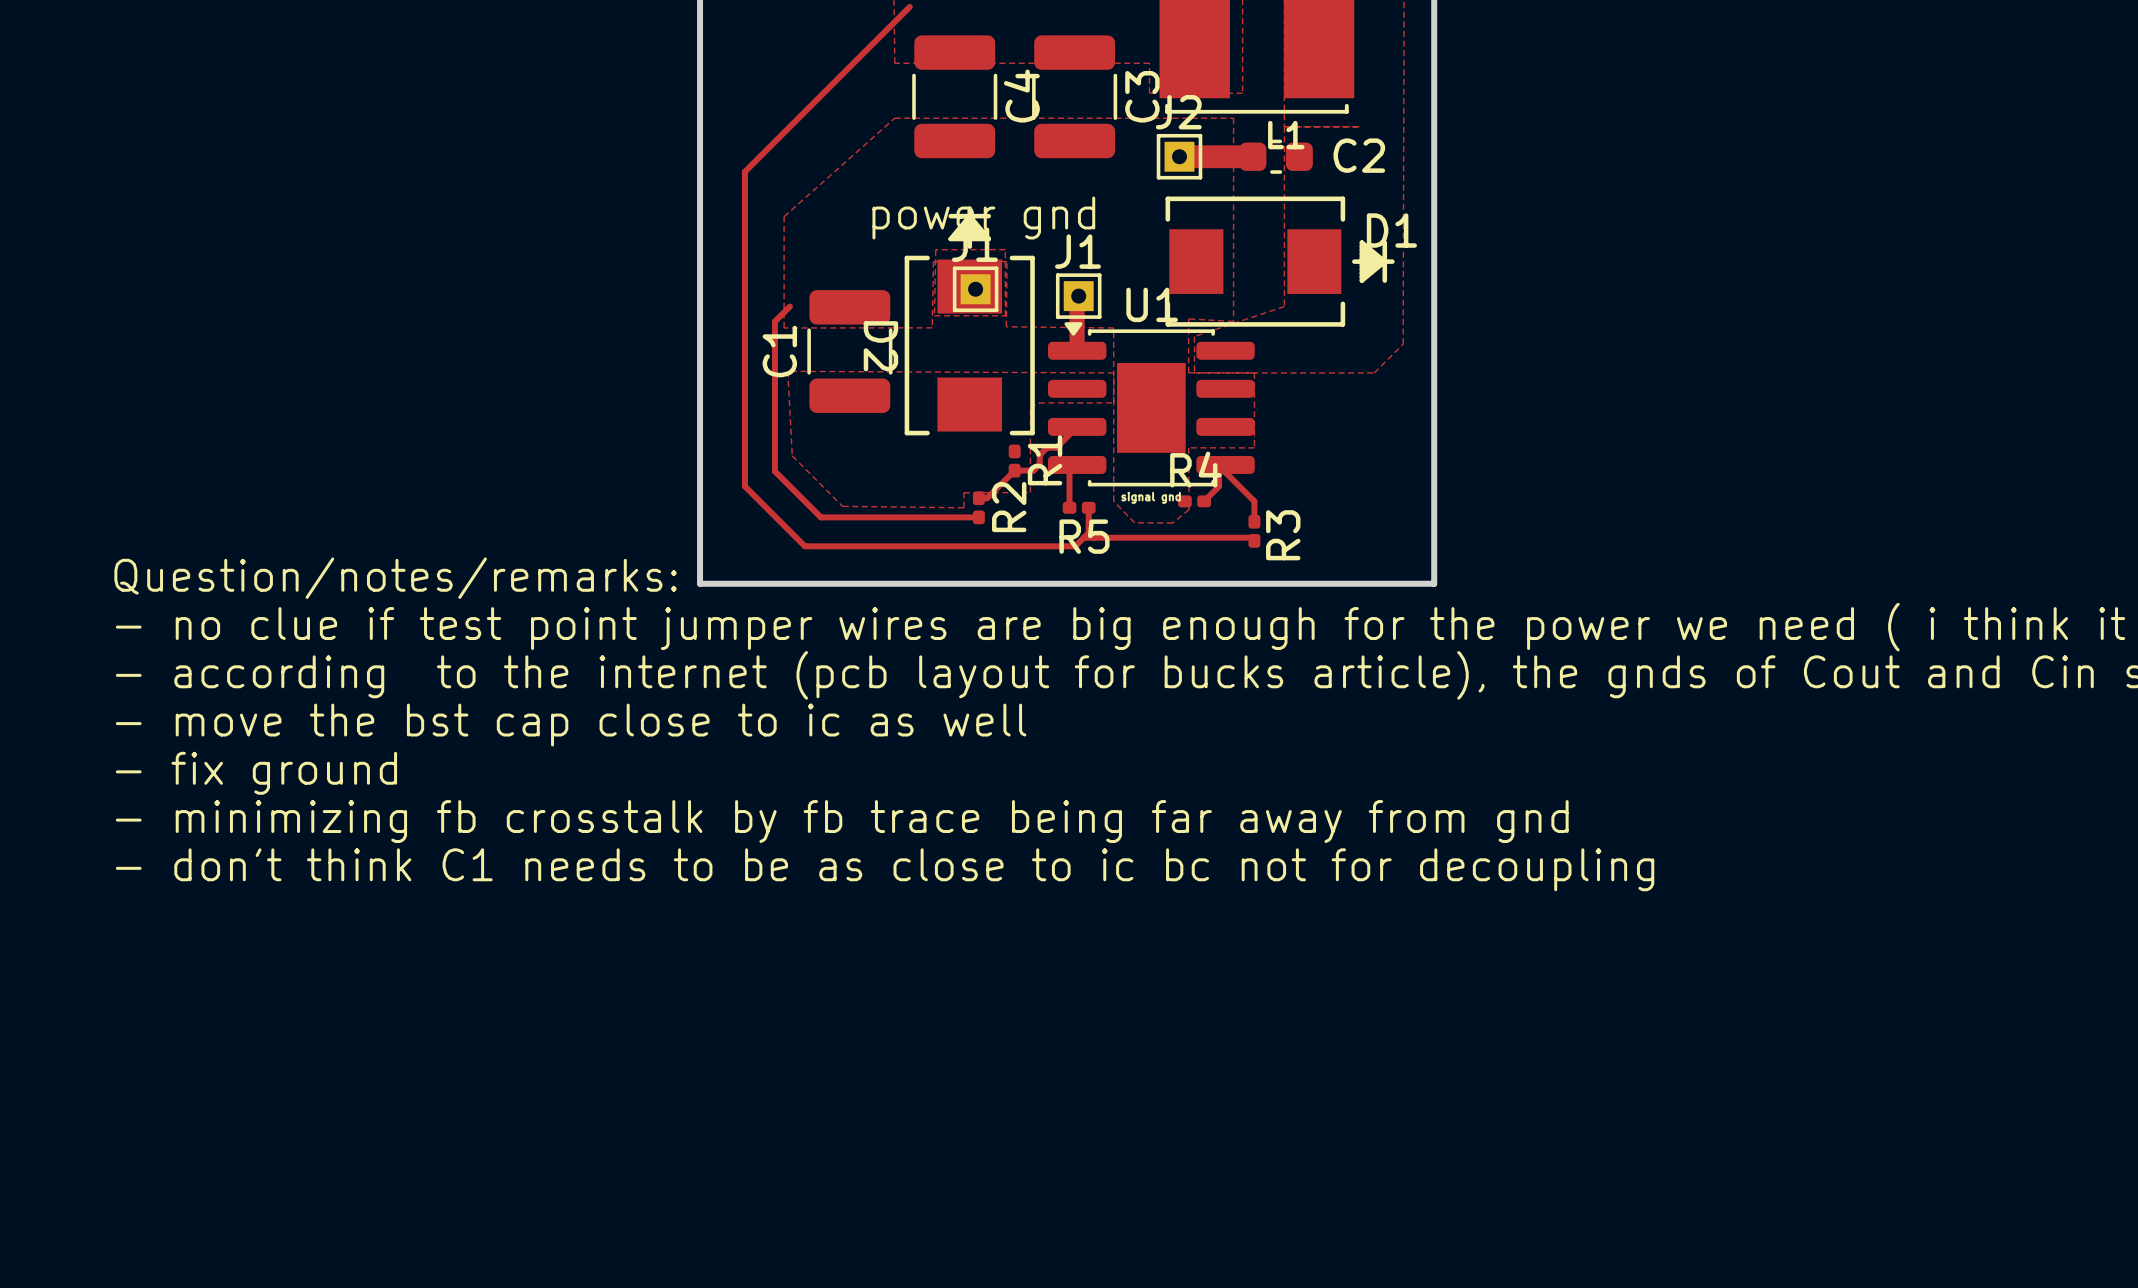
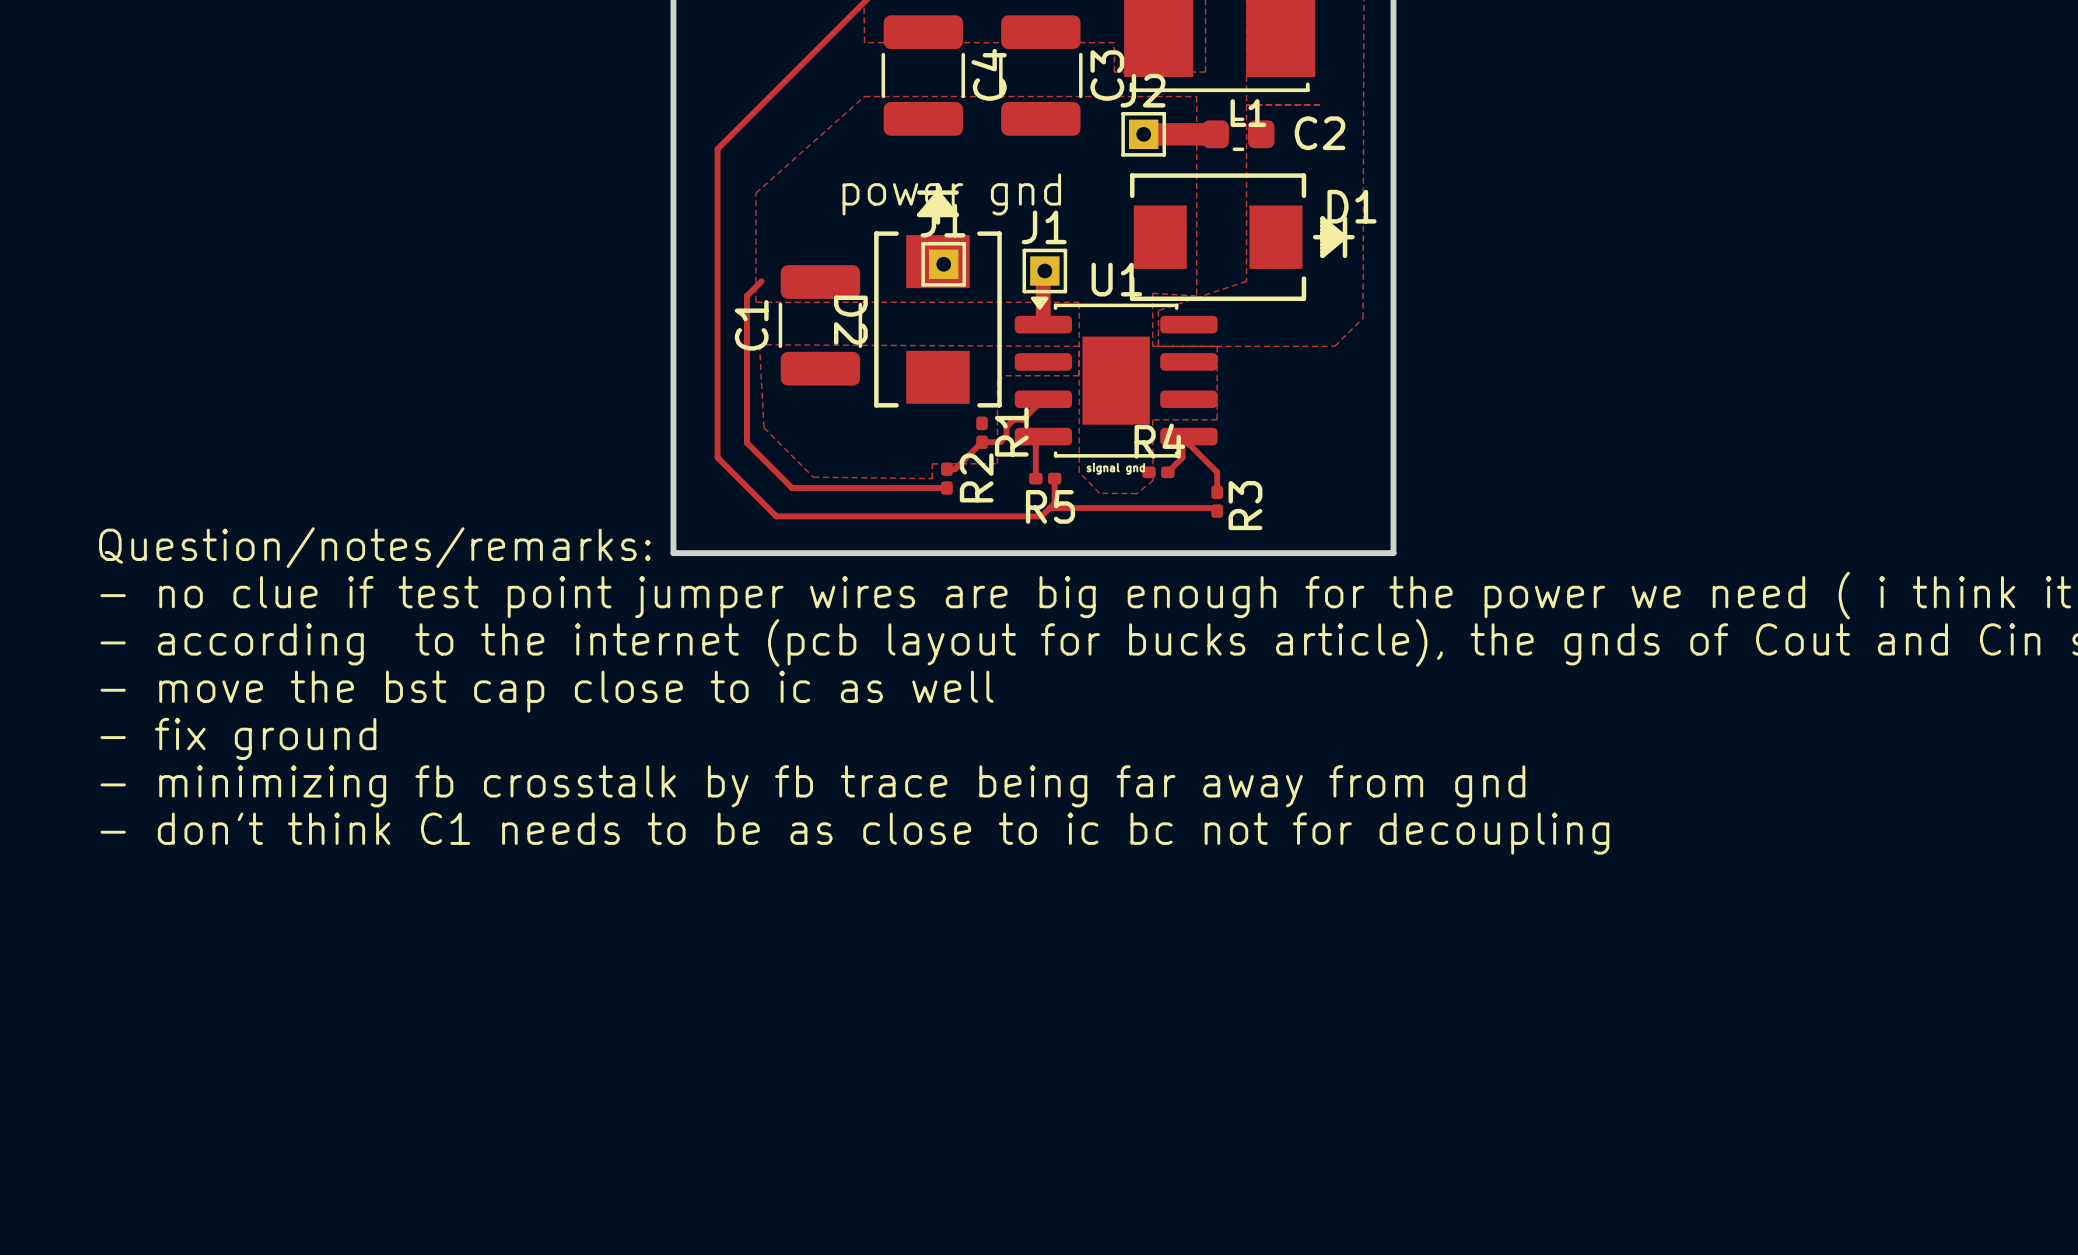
zone outline: (935, 249) (934, 315) (1005, 315) (1005, 249) (935, 249) -> none
zone outline: (784, 327) (932, 327) (933, 261) (1007, 261) (1006, 326) (1113, 327) -> (755, 302) (1079, 302)

